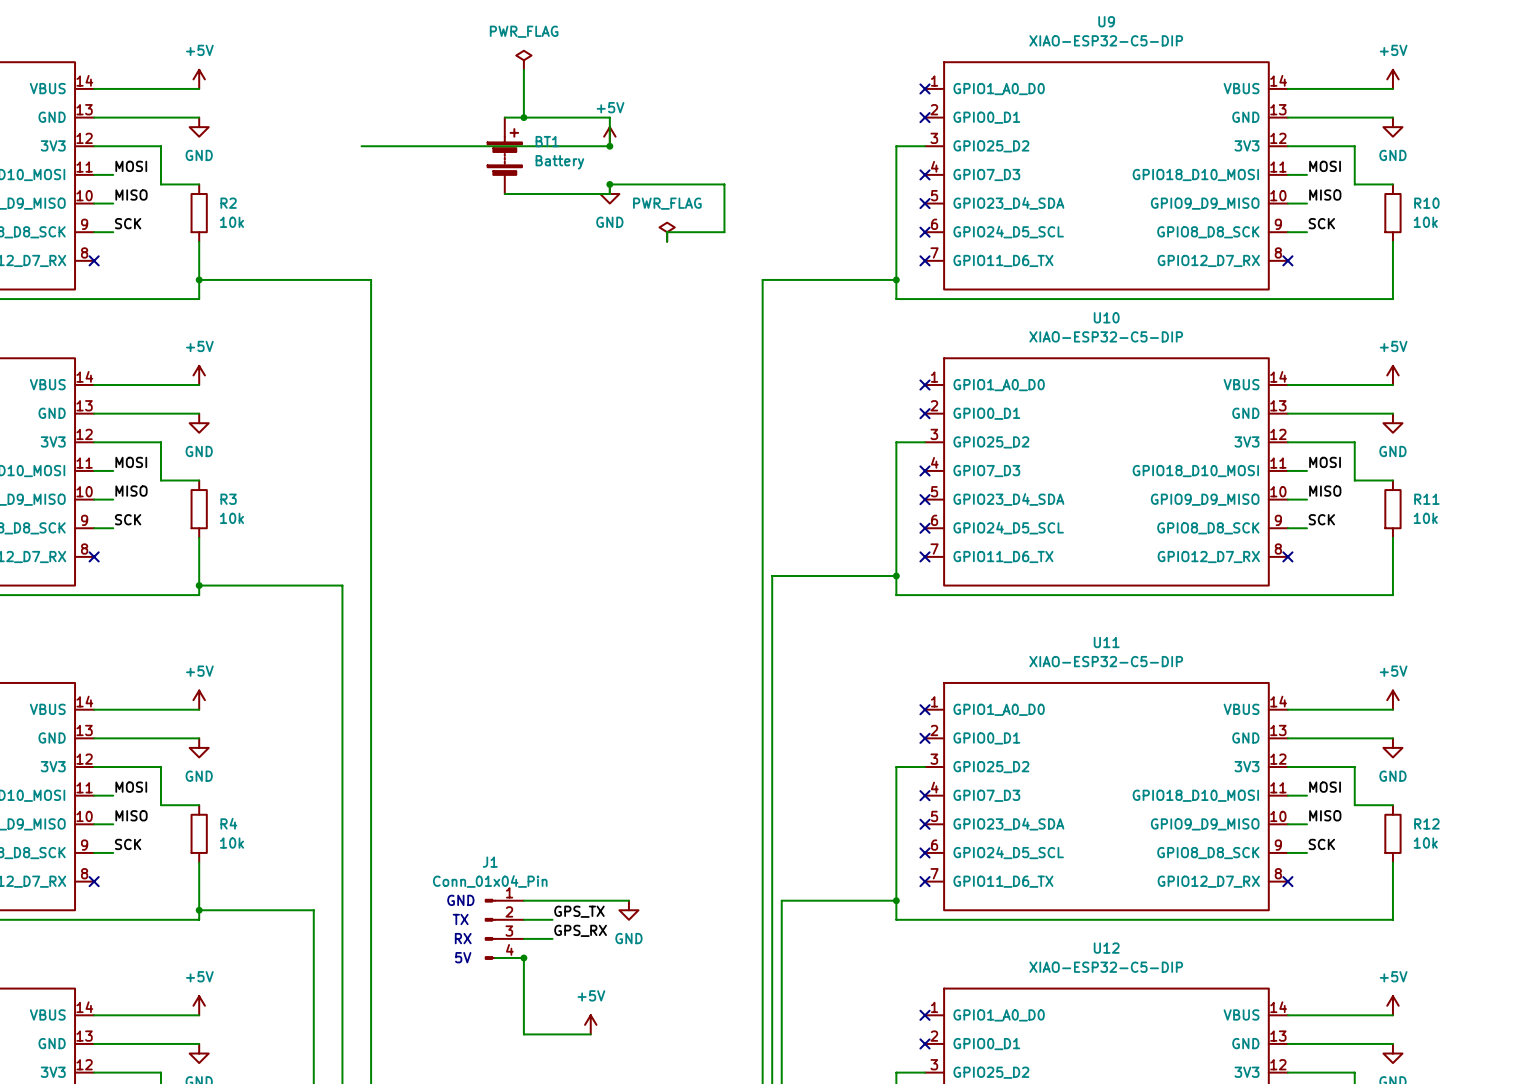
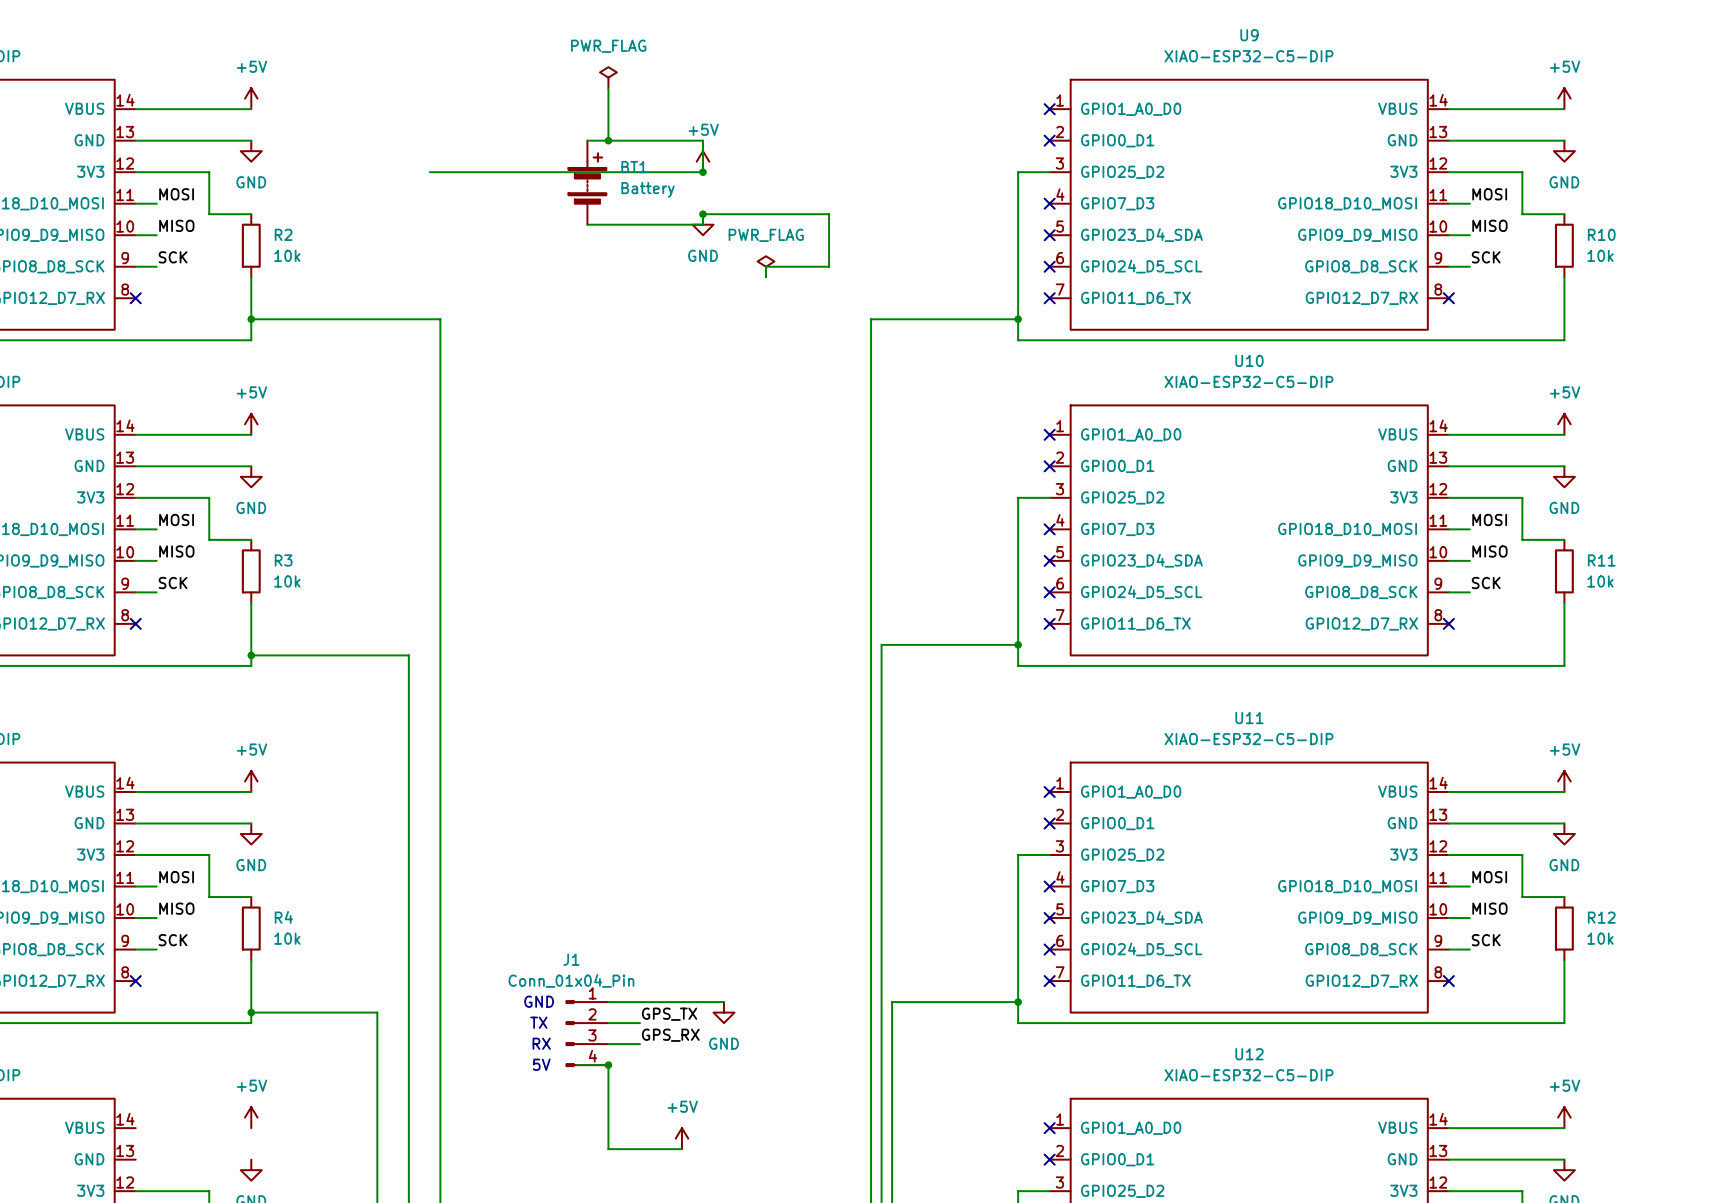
wire: (94, 1015) (199, 1015) -> none
wire: (94, 1043) (199, 1043) -> none

